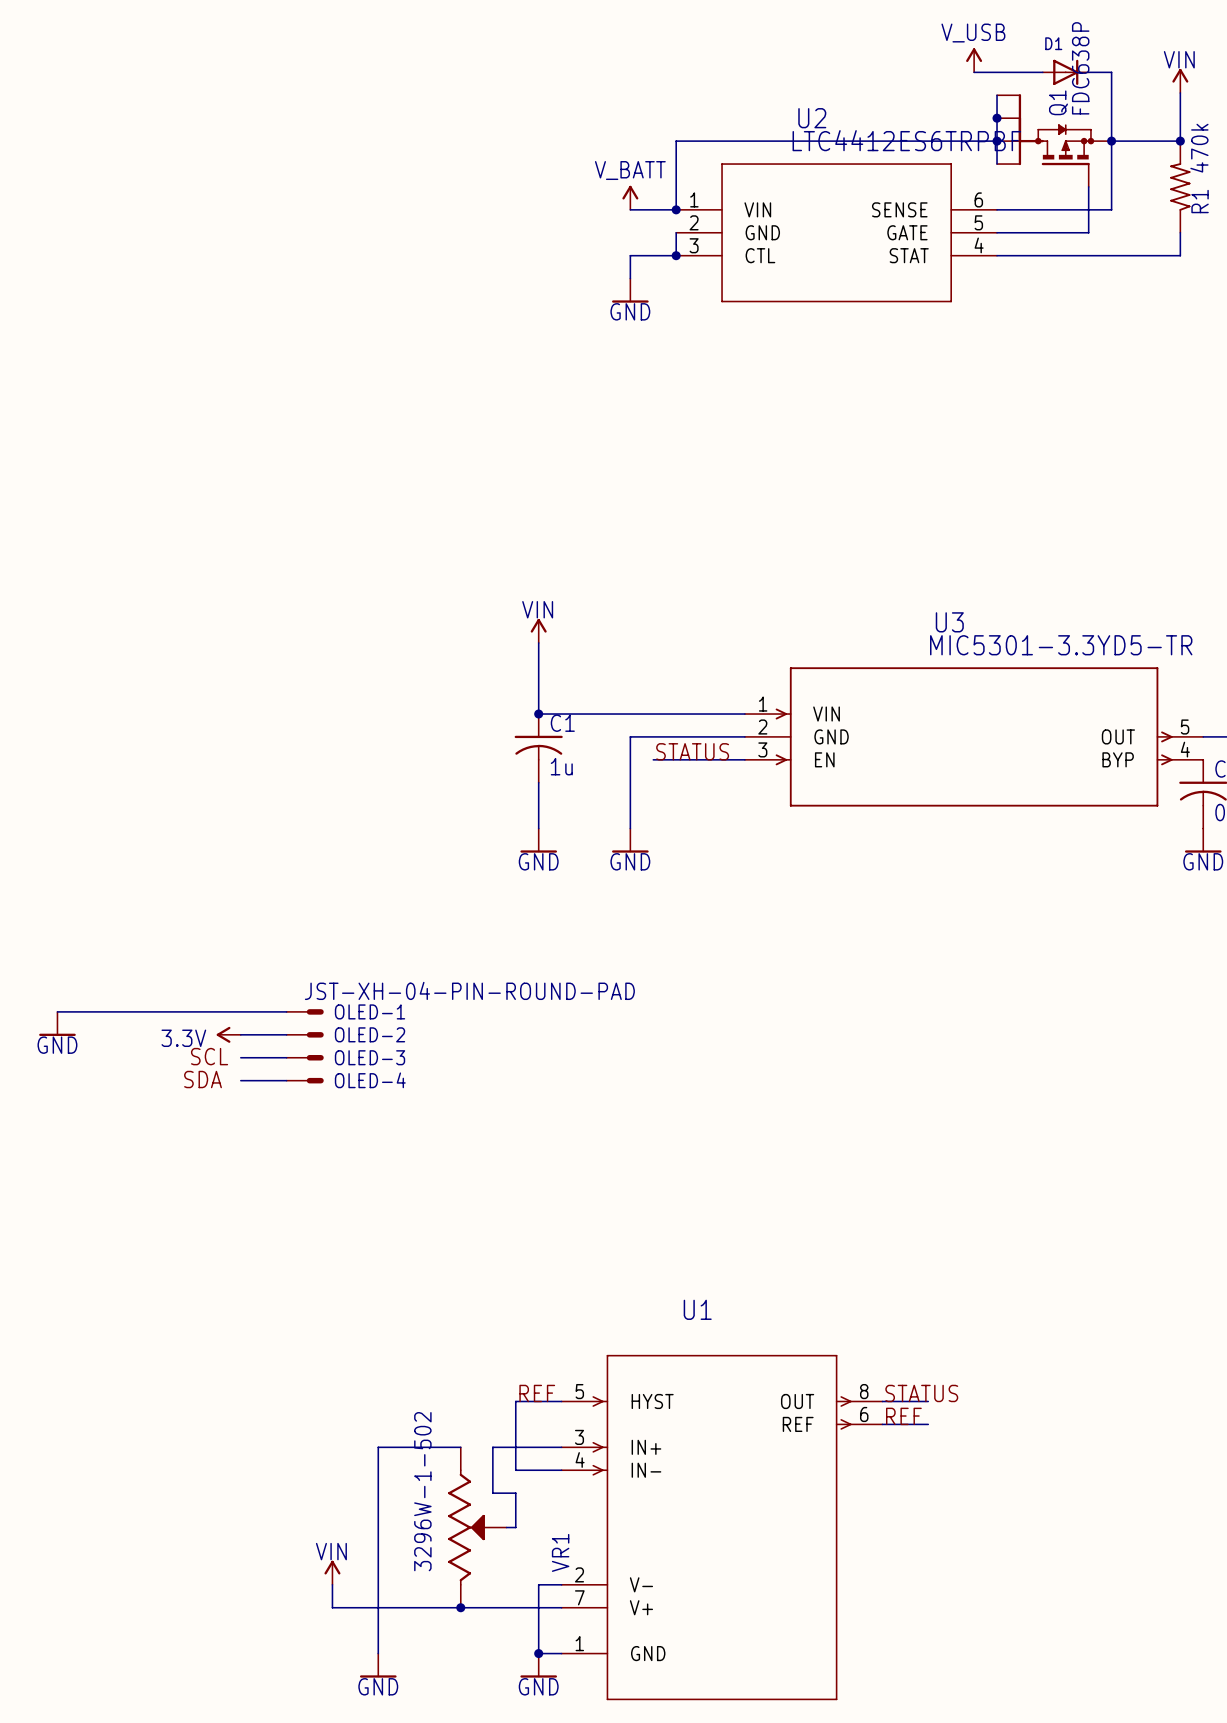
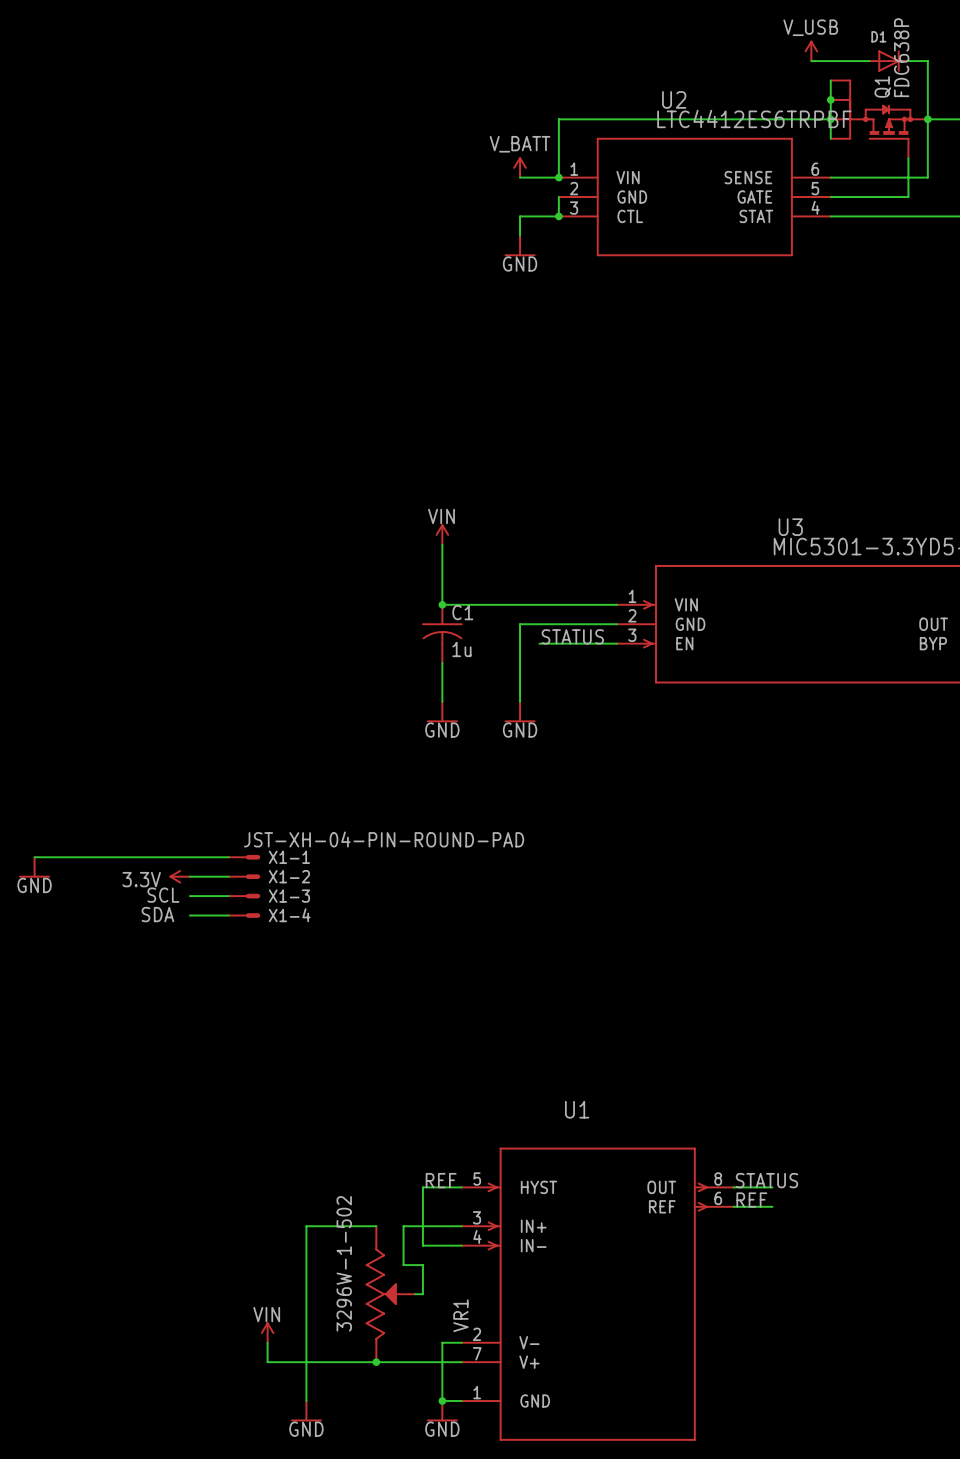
OLED-1 name: OLED-1 (370, 1011) -> X1-1 (289, 857)
OLED-2 name: OLED-2 (370, 1034) -> X1-2 (289, 876)
OLED-3 name: OLED-3 (370, 1057) -> X1-3 (289, 896)
OLED-4 name: OLED-4 (370, 1080) -> X1-4 (289, 915)

